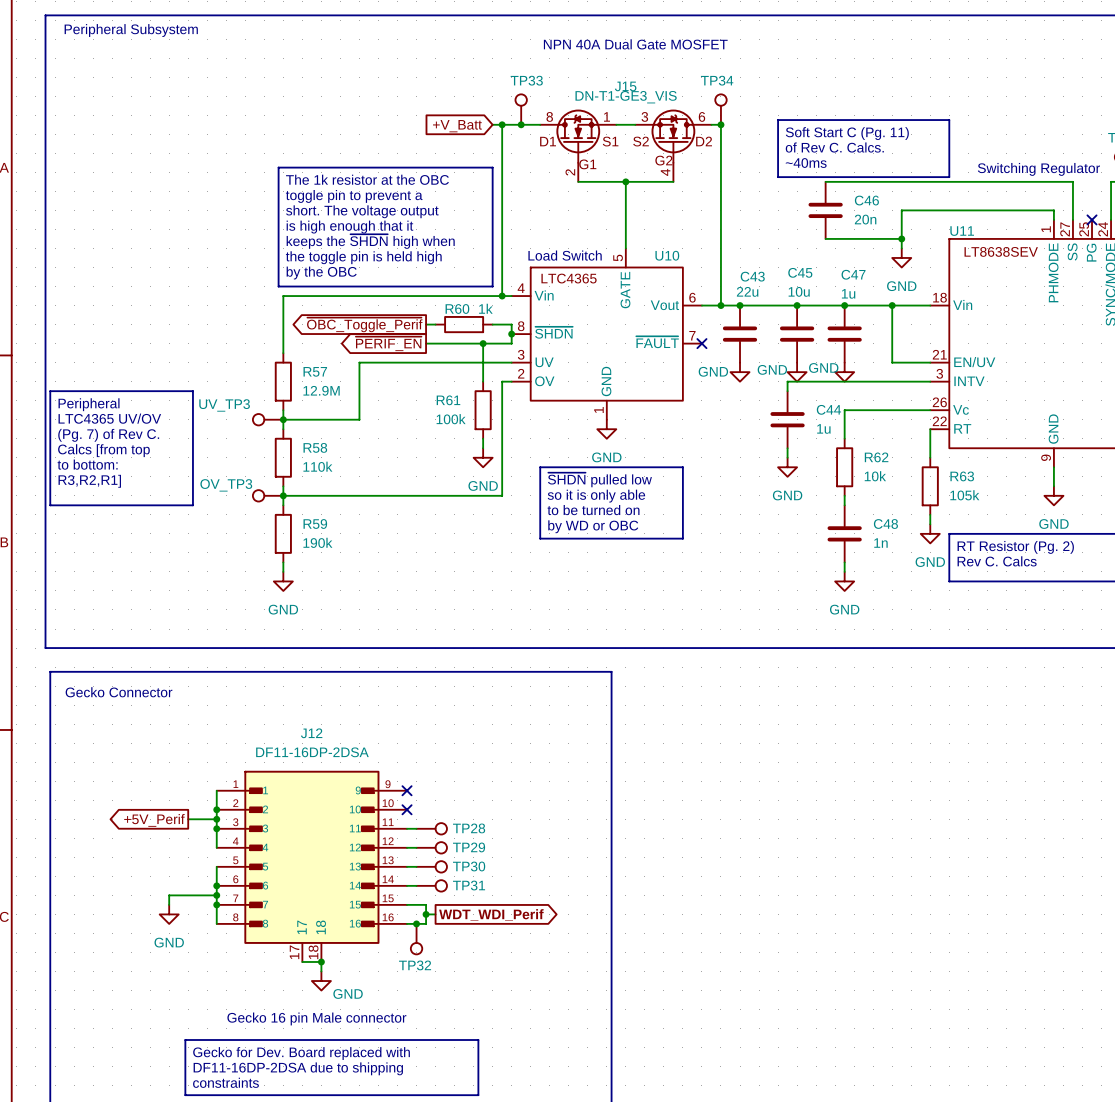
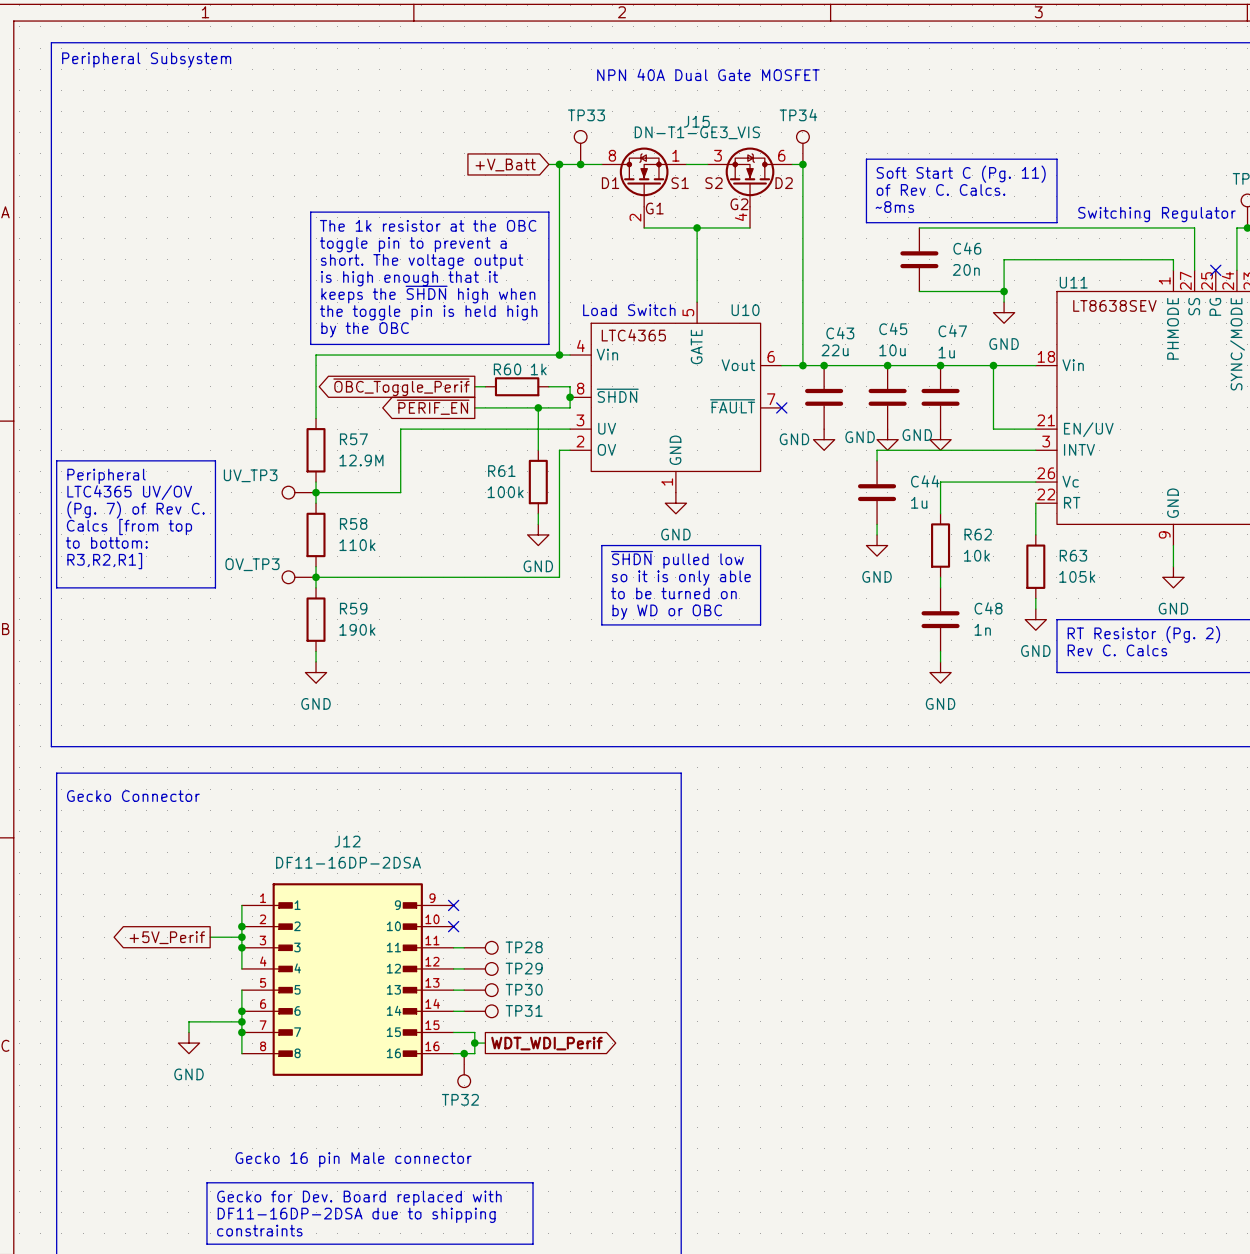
text: ~40ms (806, 163) -> ~8ms (894, 207)
J12 symbol: [216, 770, 408, 962] -> [241, 883, 454, 1076]
wire: (302, 961) (321, 961) (321, 971) -> none
junction: (321, 961) -> none
power symbol: GND (321, 981) -> none

